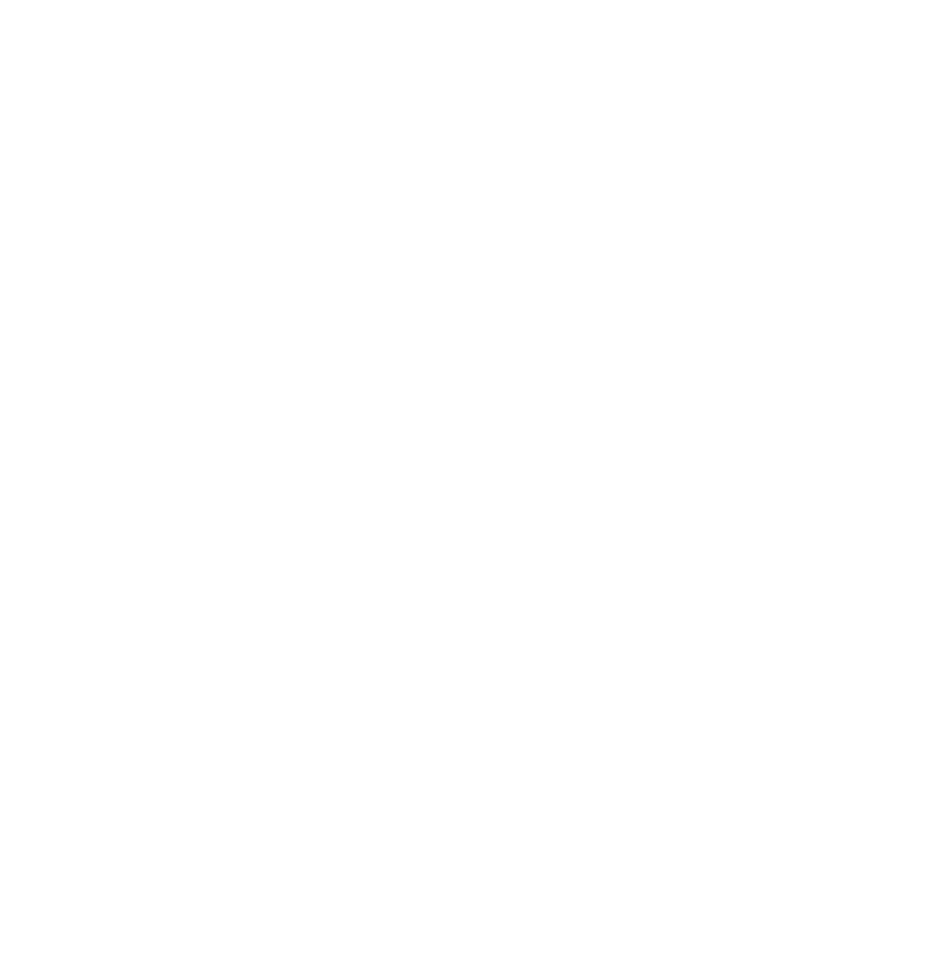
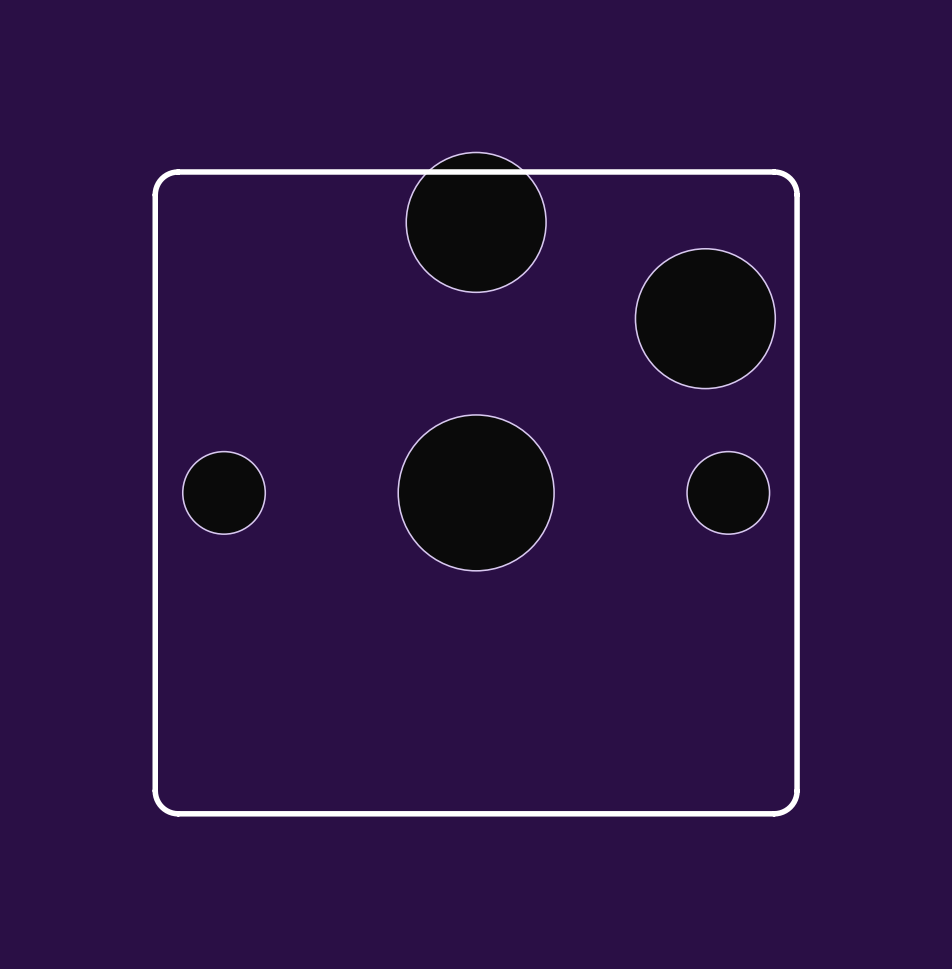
part: none -> (476, 484)

